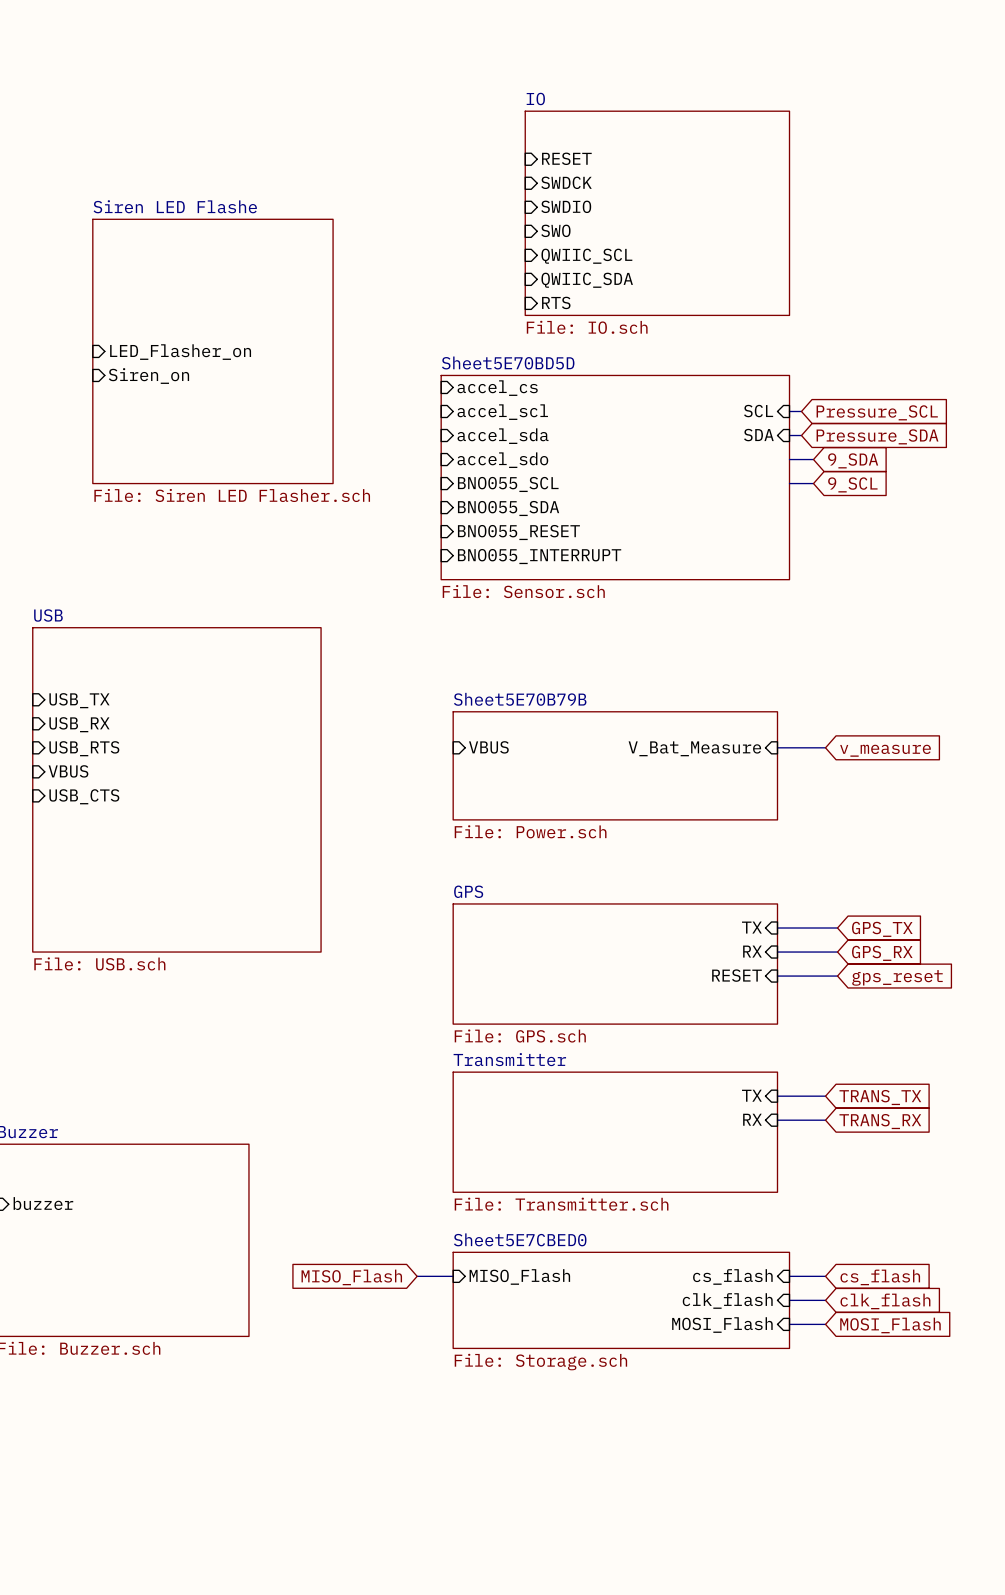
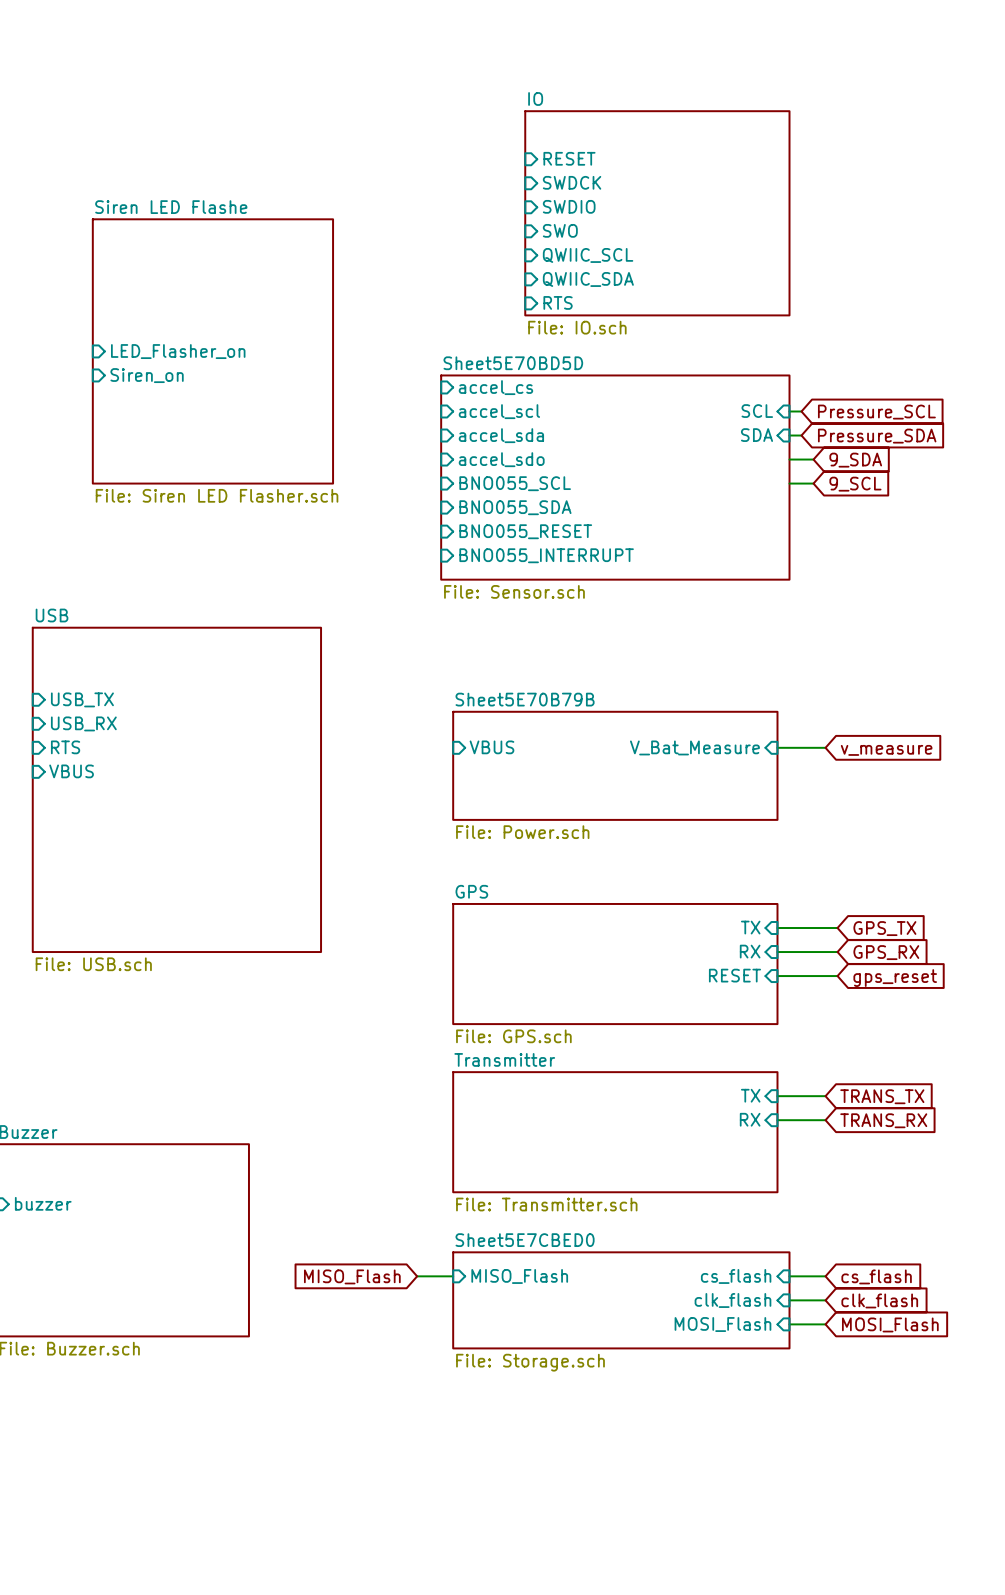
sheet pin: USB_RTS (84, 748) -> RTS (65, 747)
sheet pin: USB_CTS (84, 796) -> none

